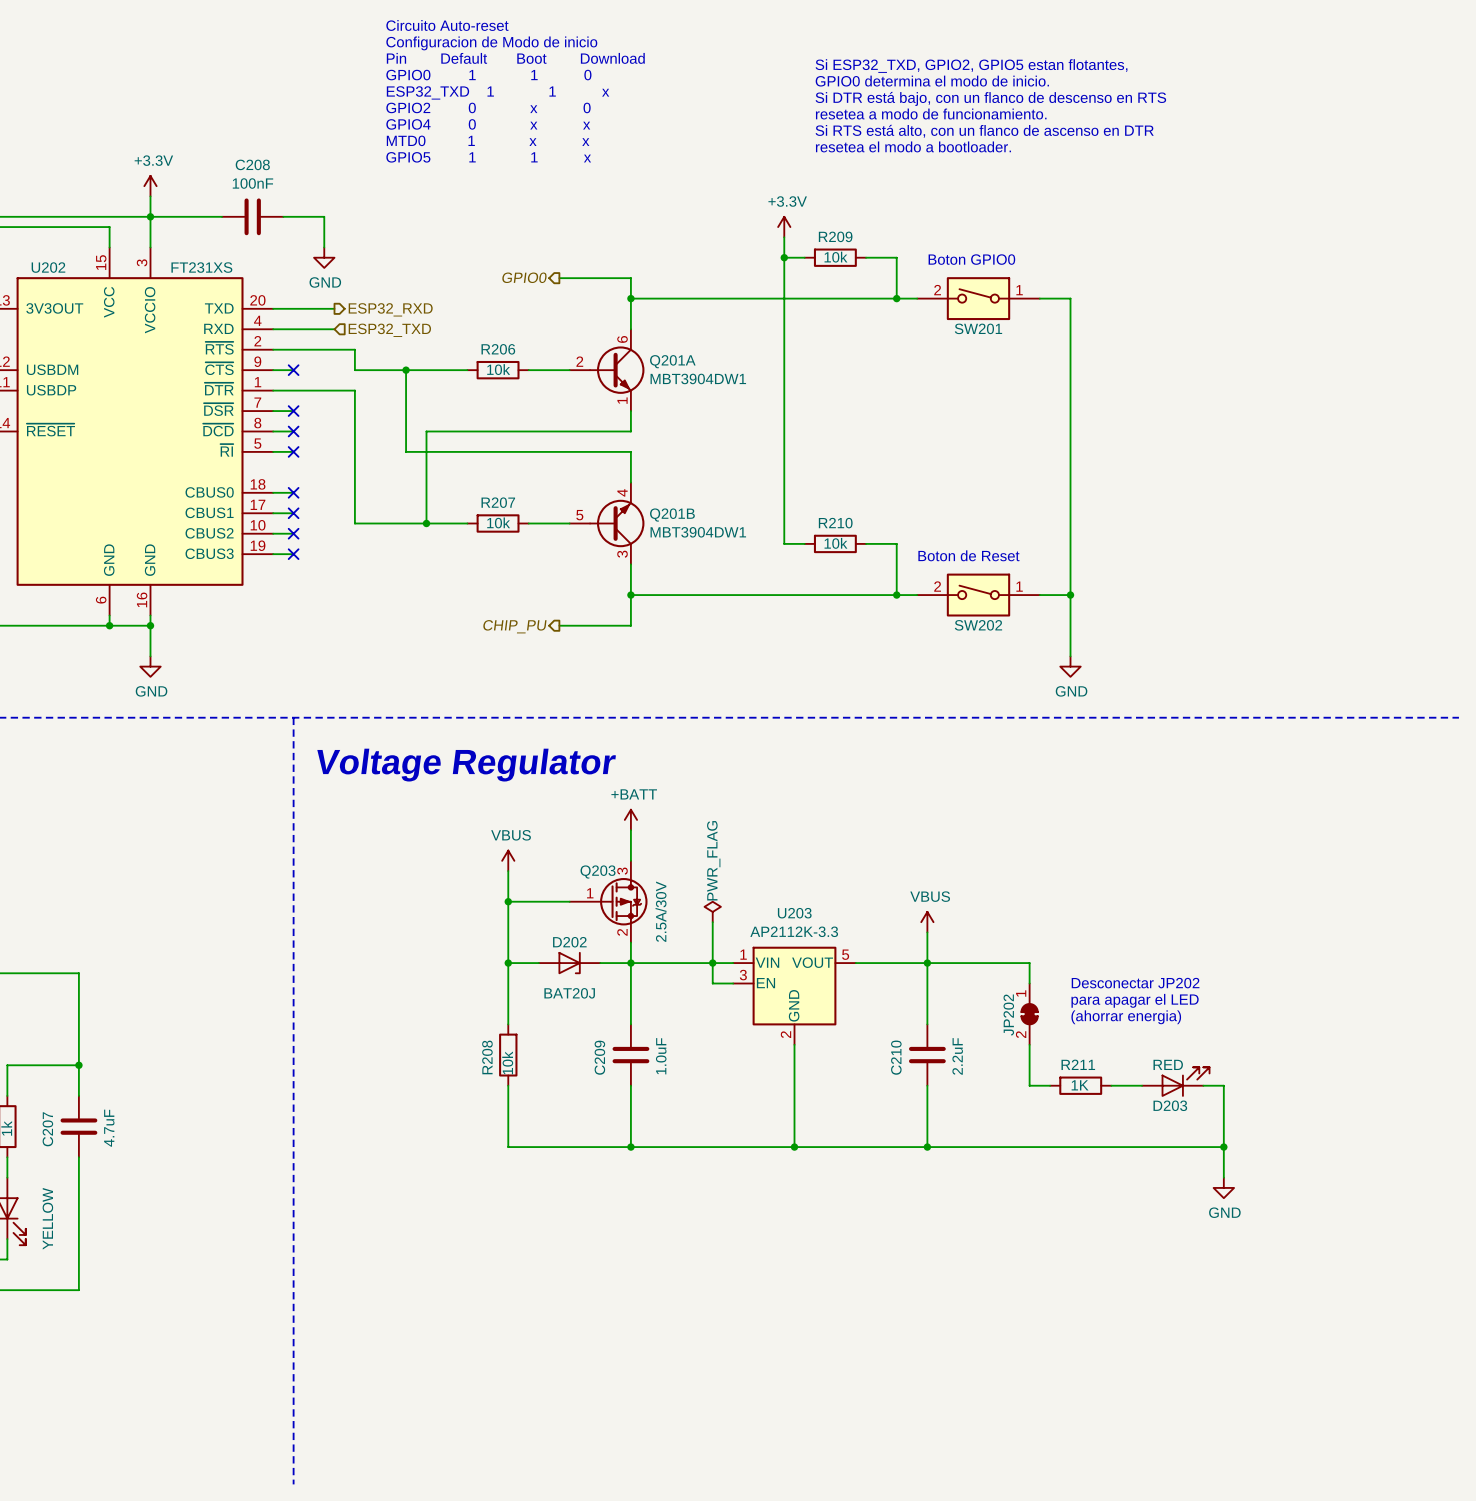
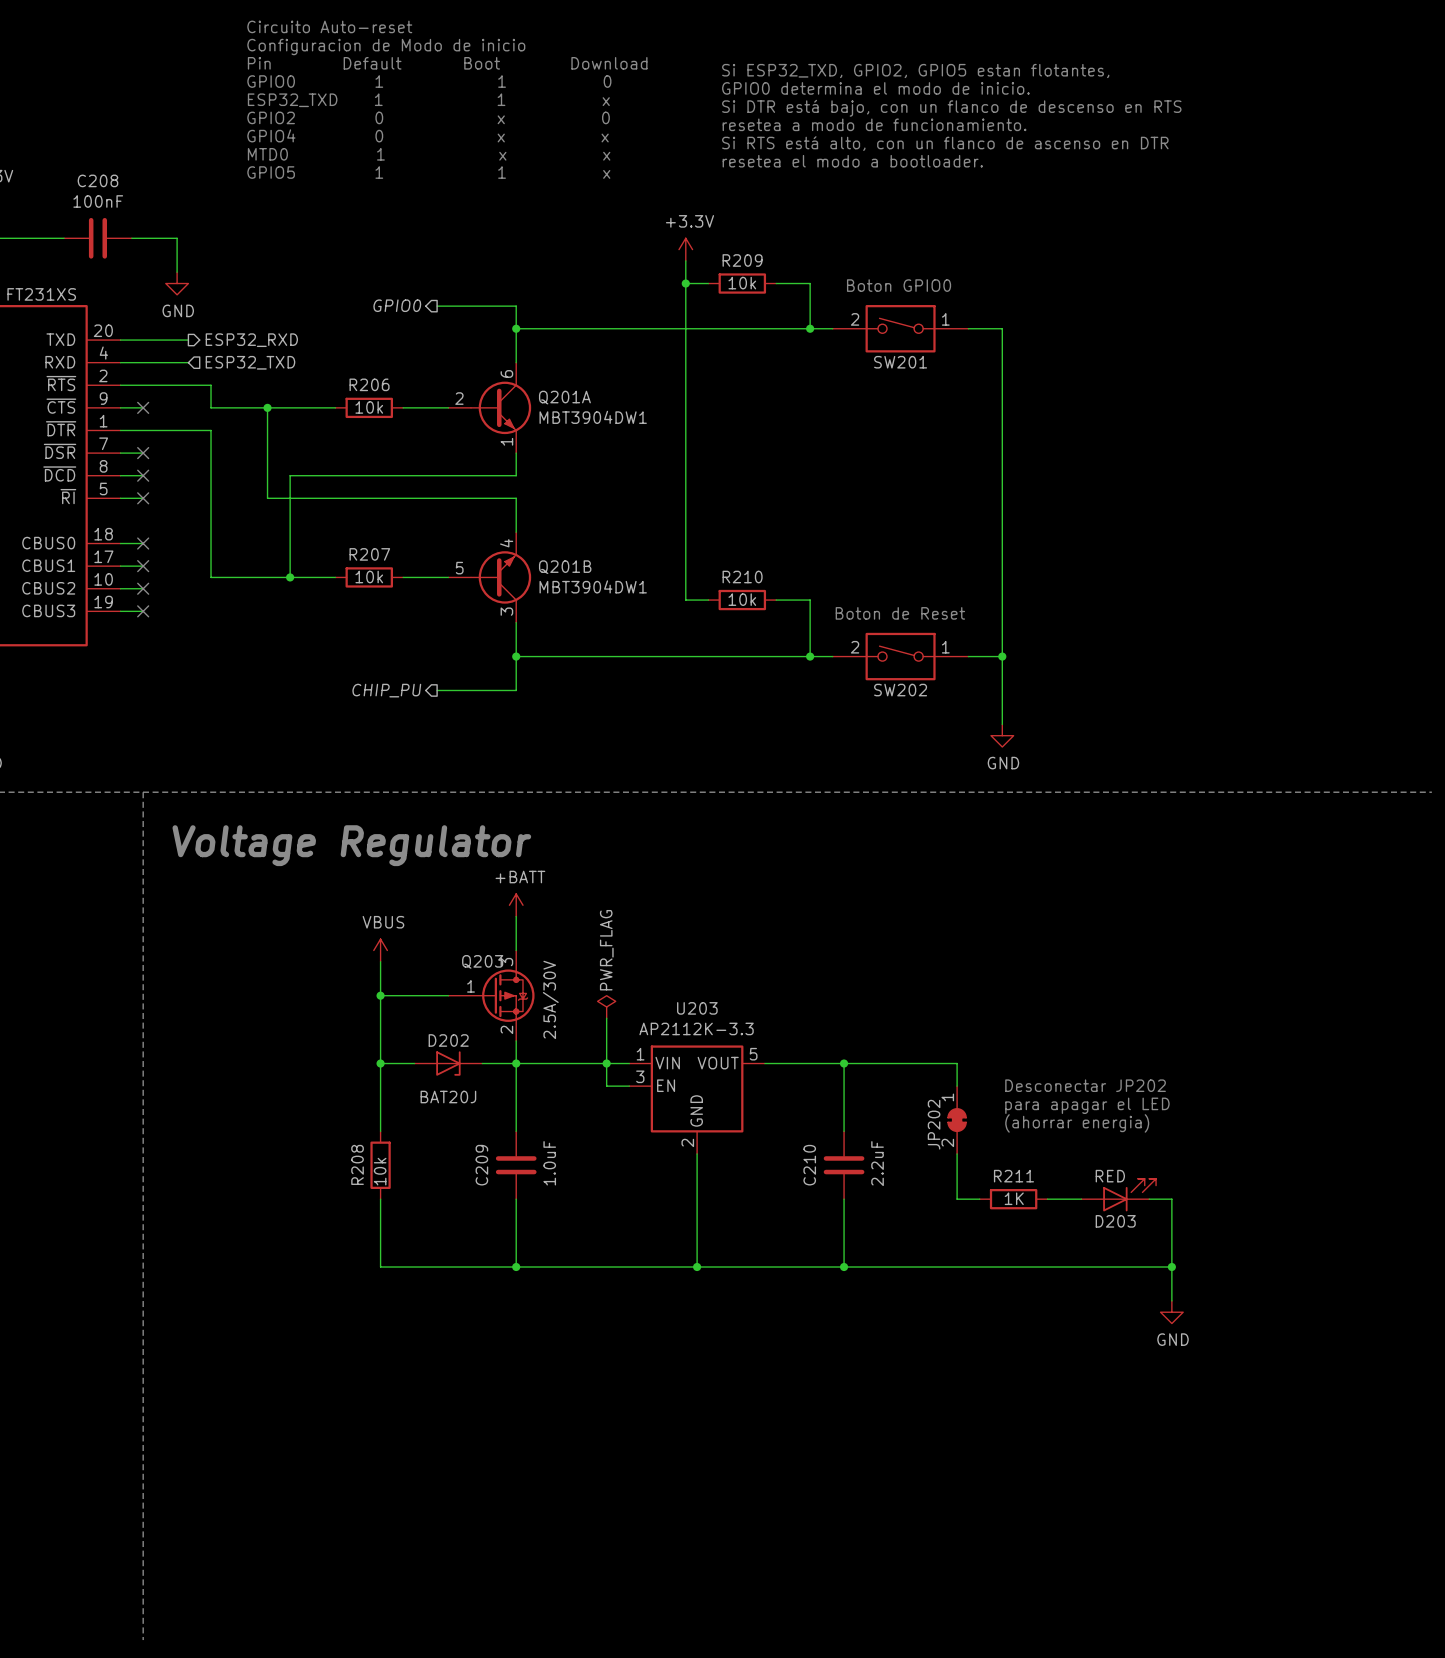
power symbol: VBUS (927, 922) -> none
wire: (927, 932) (927, 963) -> none

